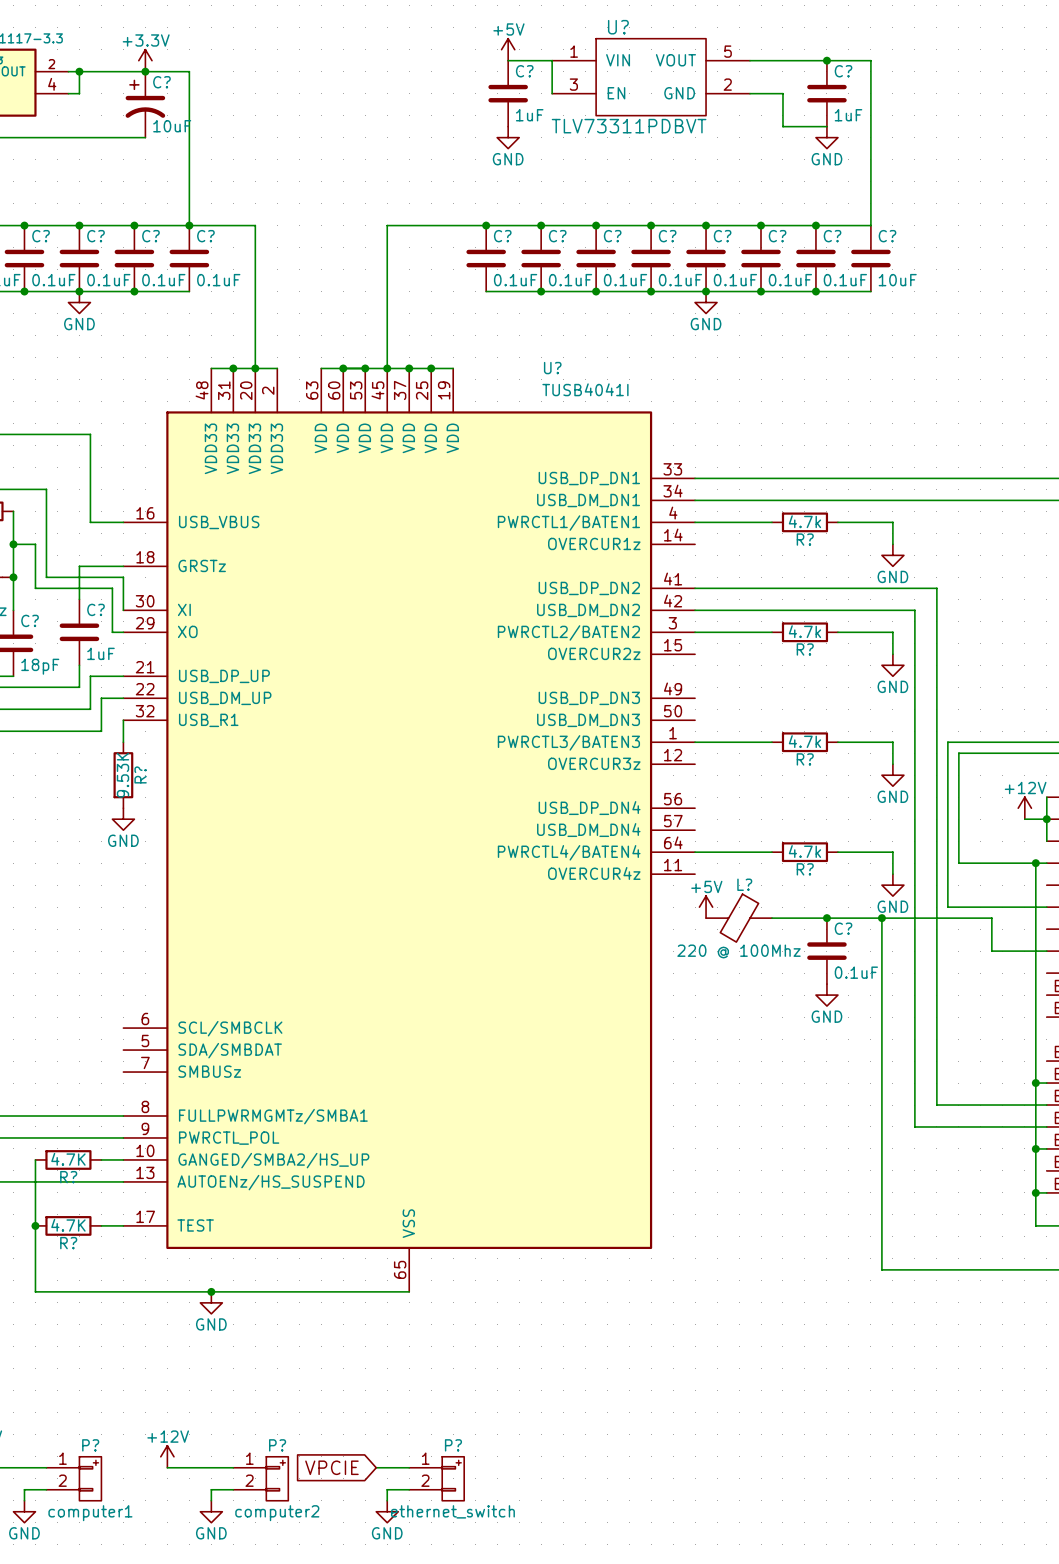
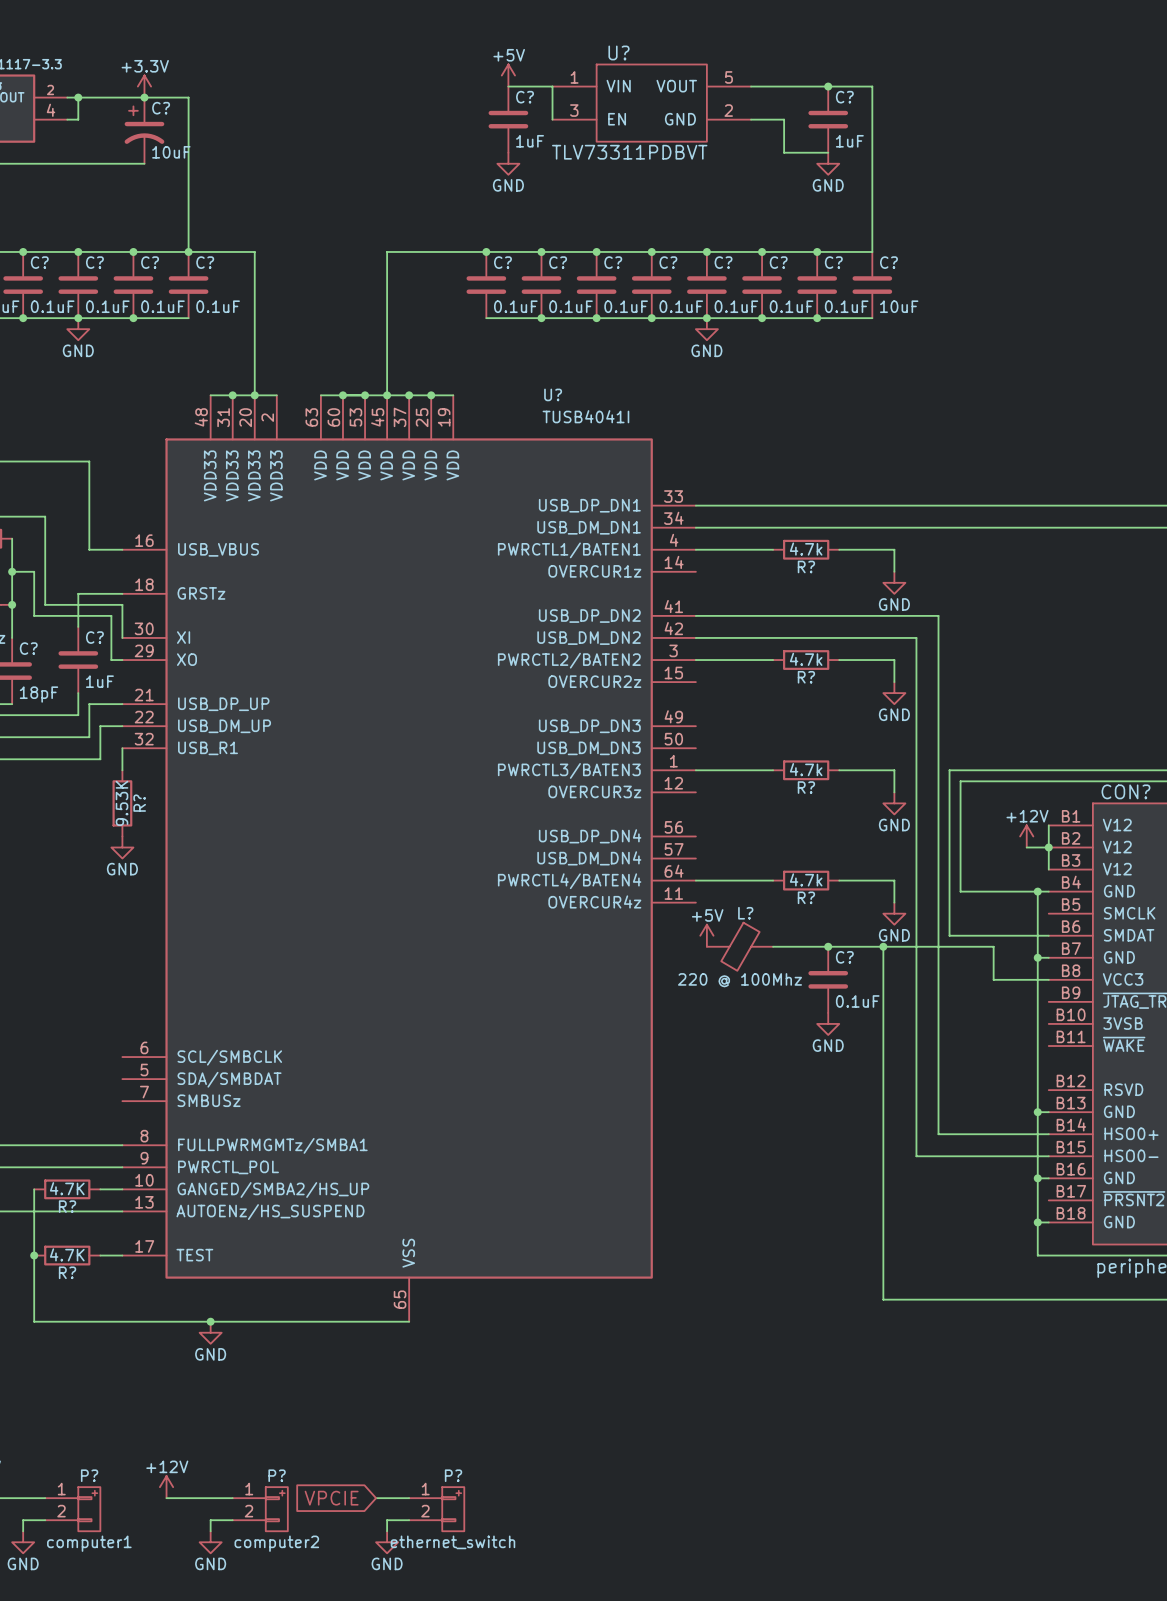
wire: none -> (1037, 957) (1048, 957)
junction: none -> (1037, 957)

